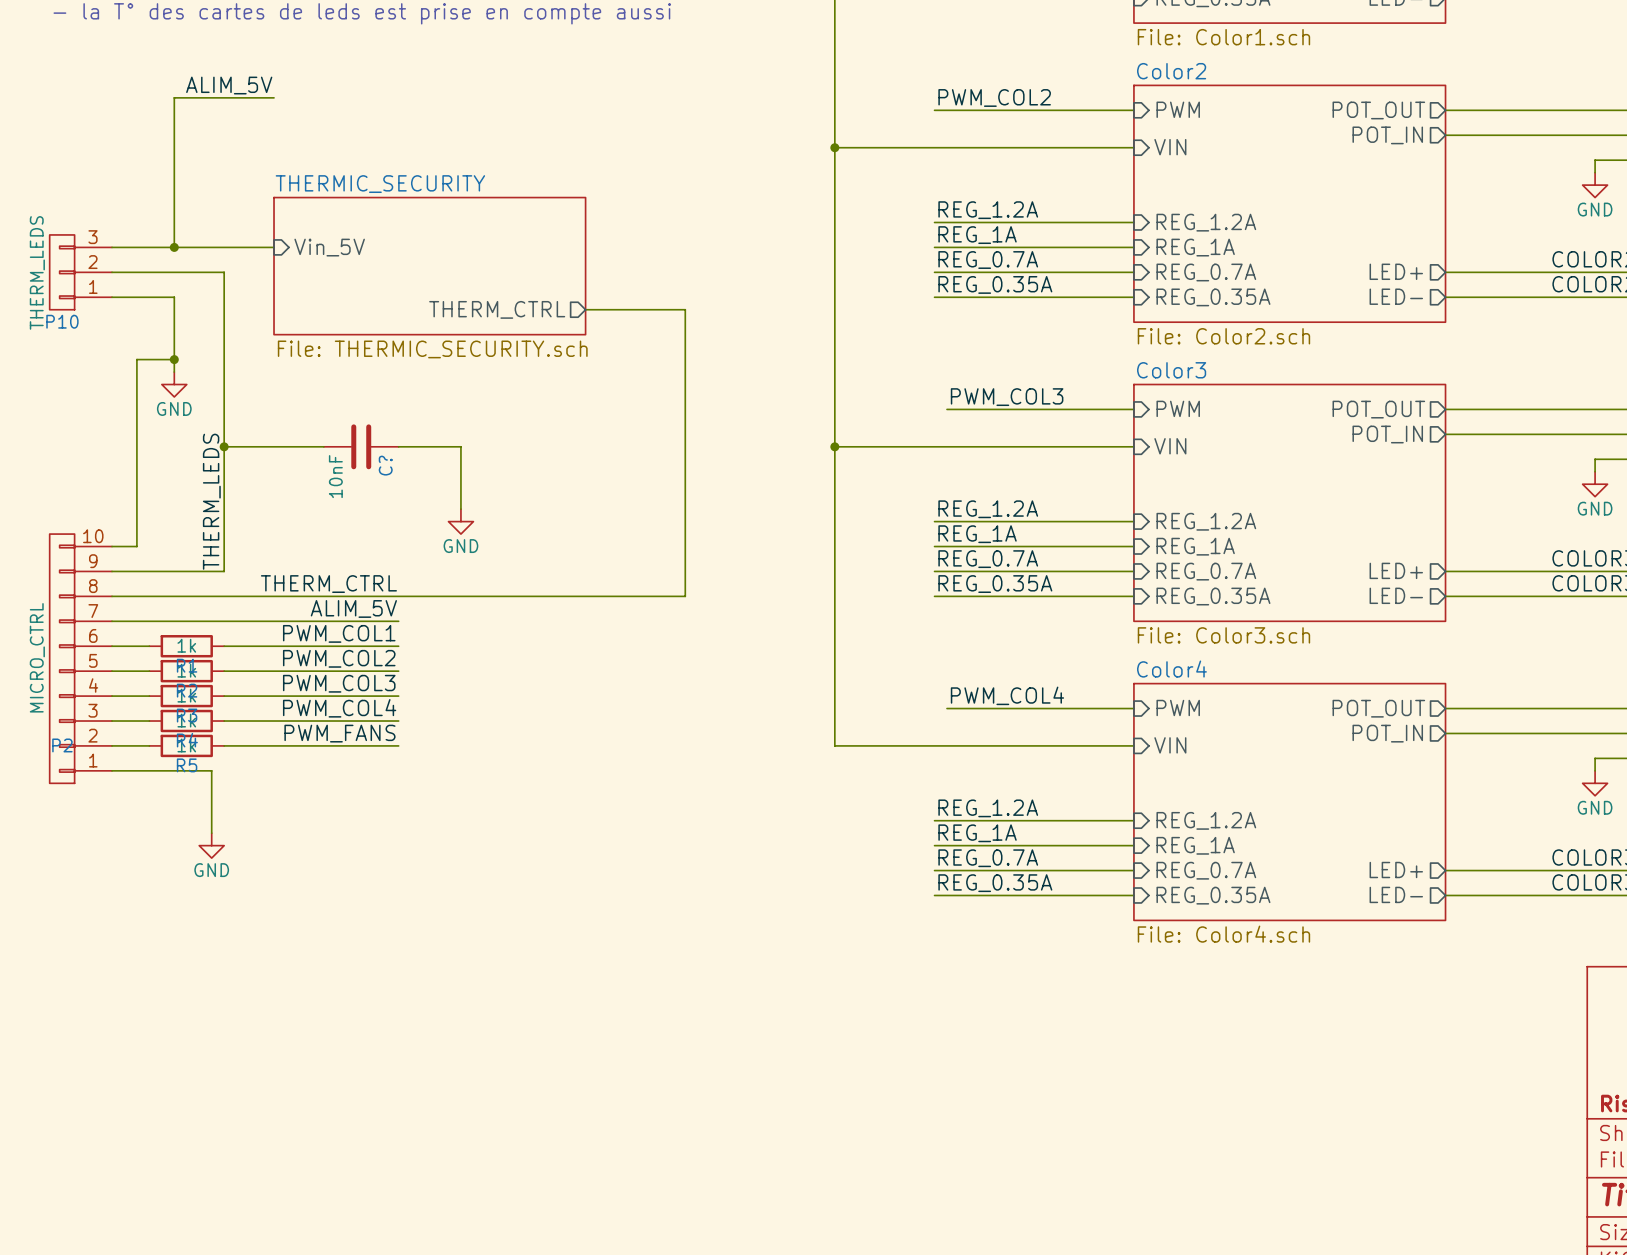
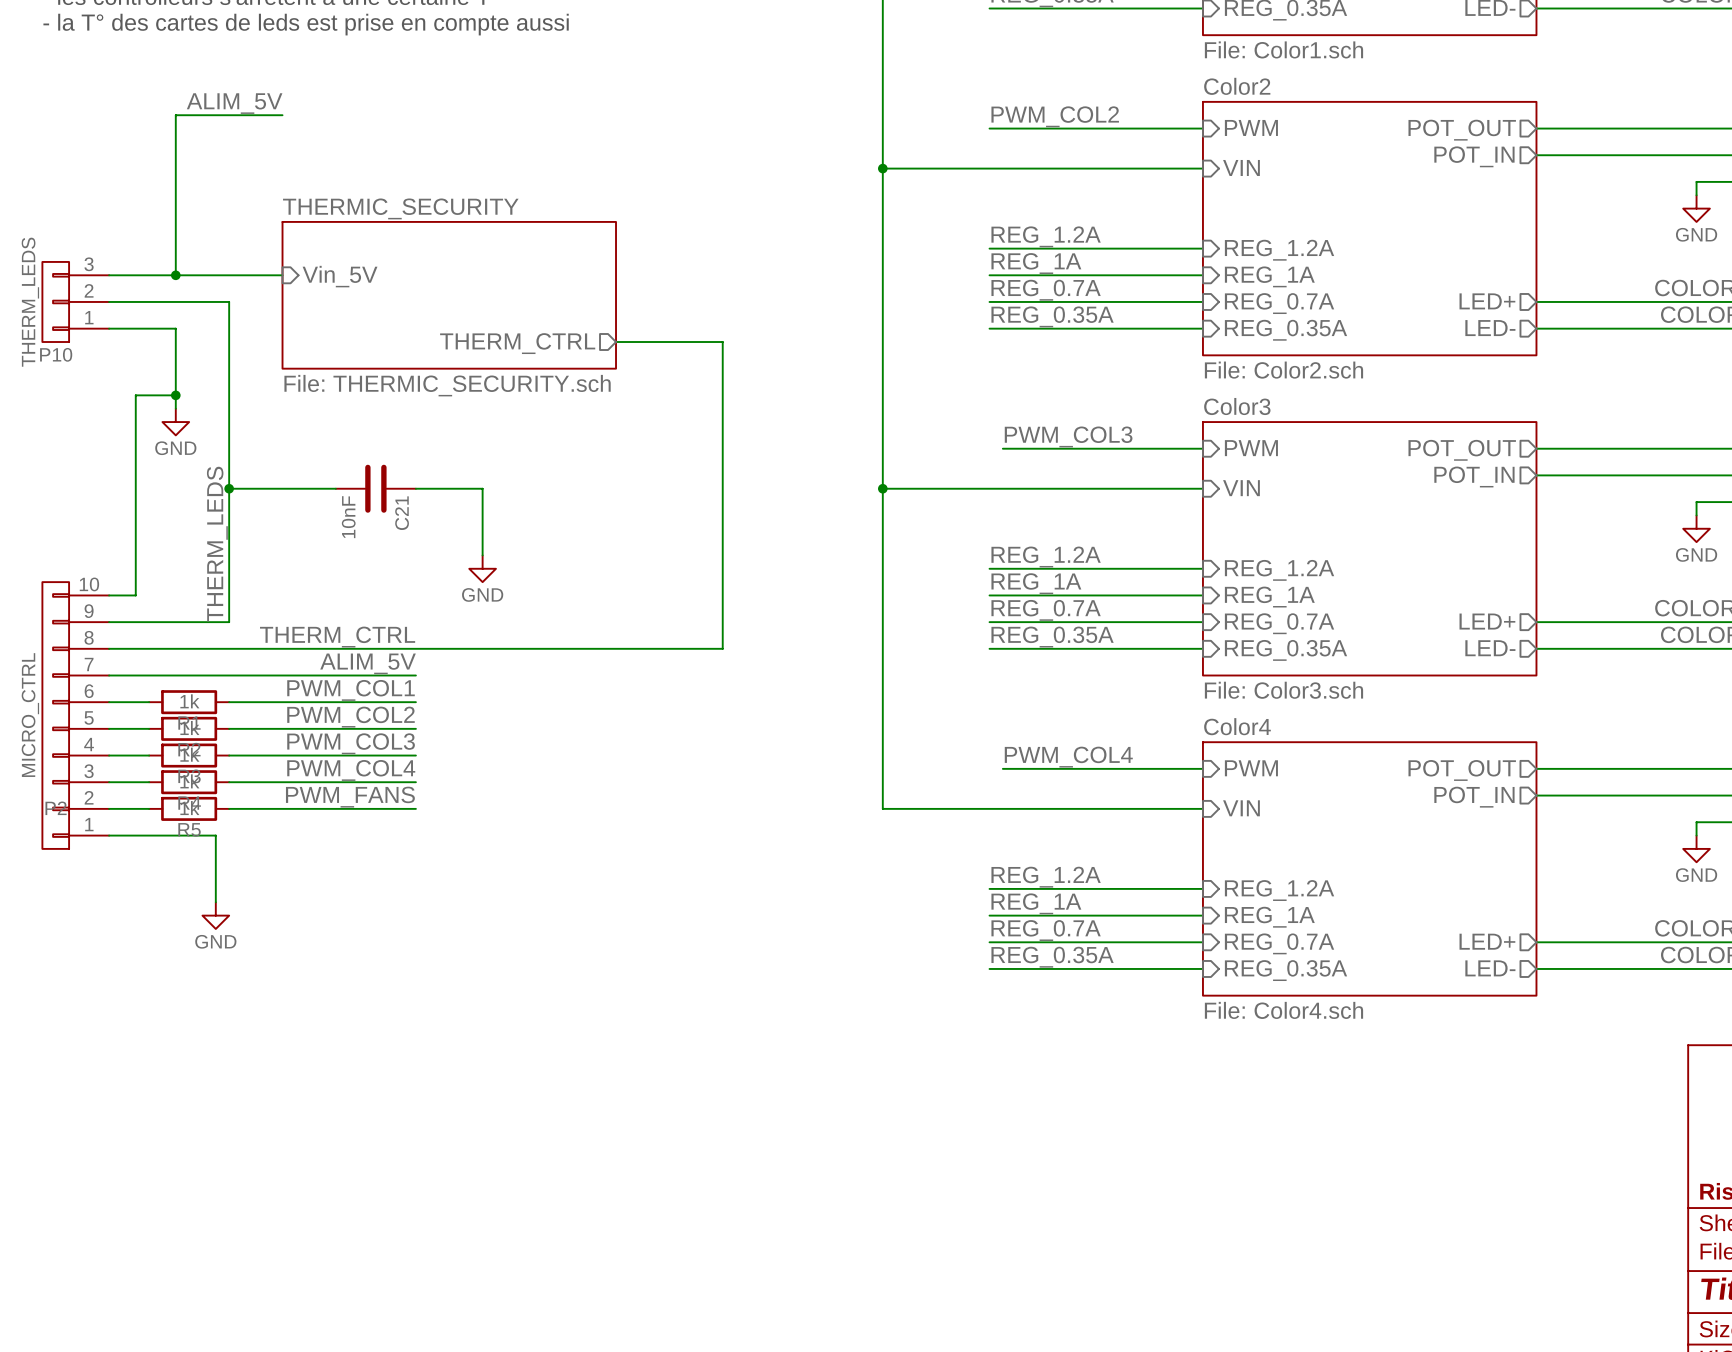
C? name: C? (385, 465) -> C21 (402, 513)

